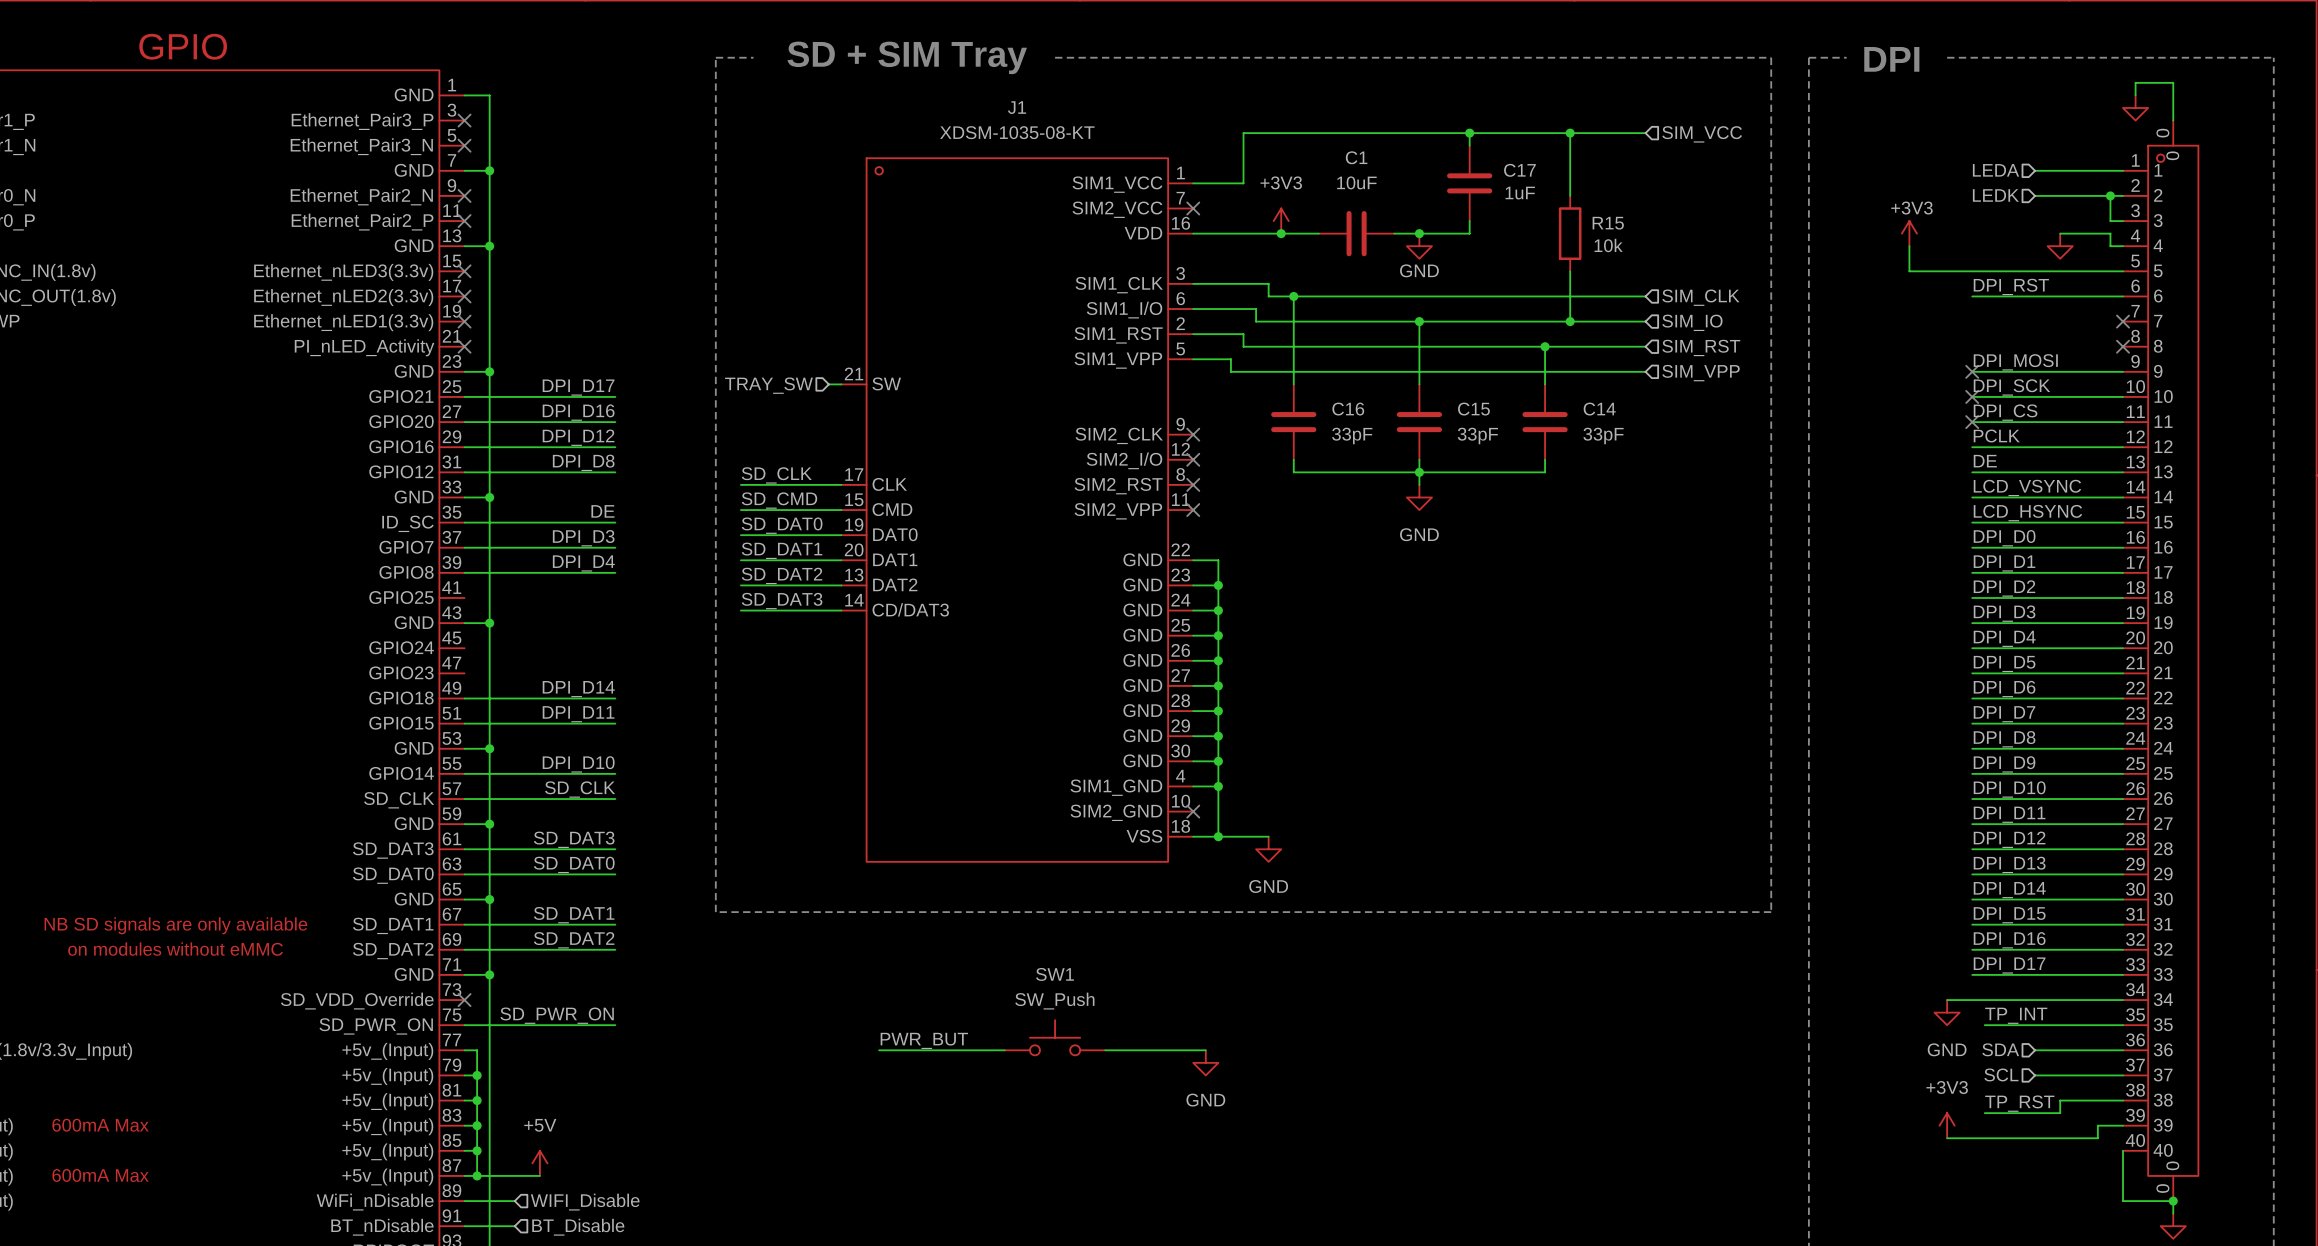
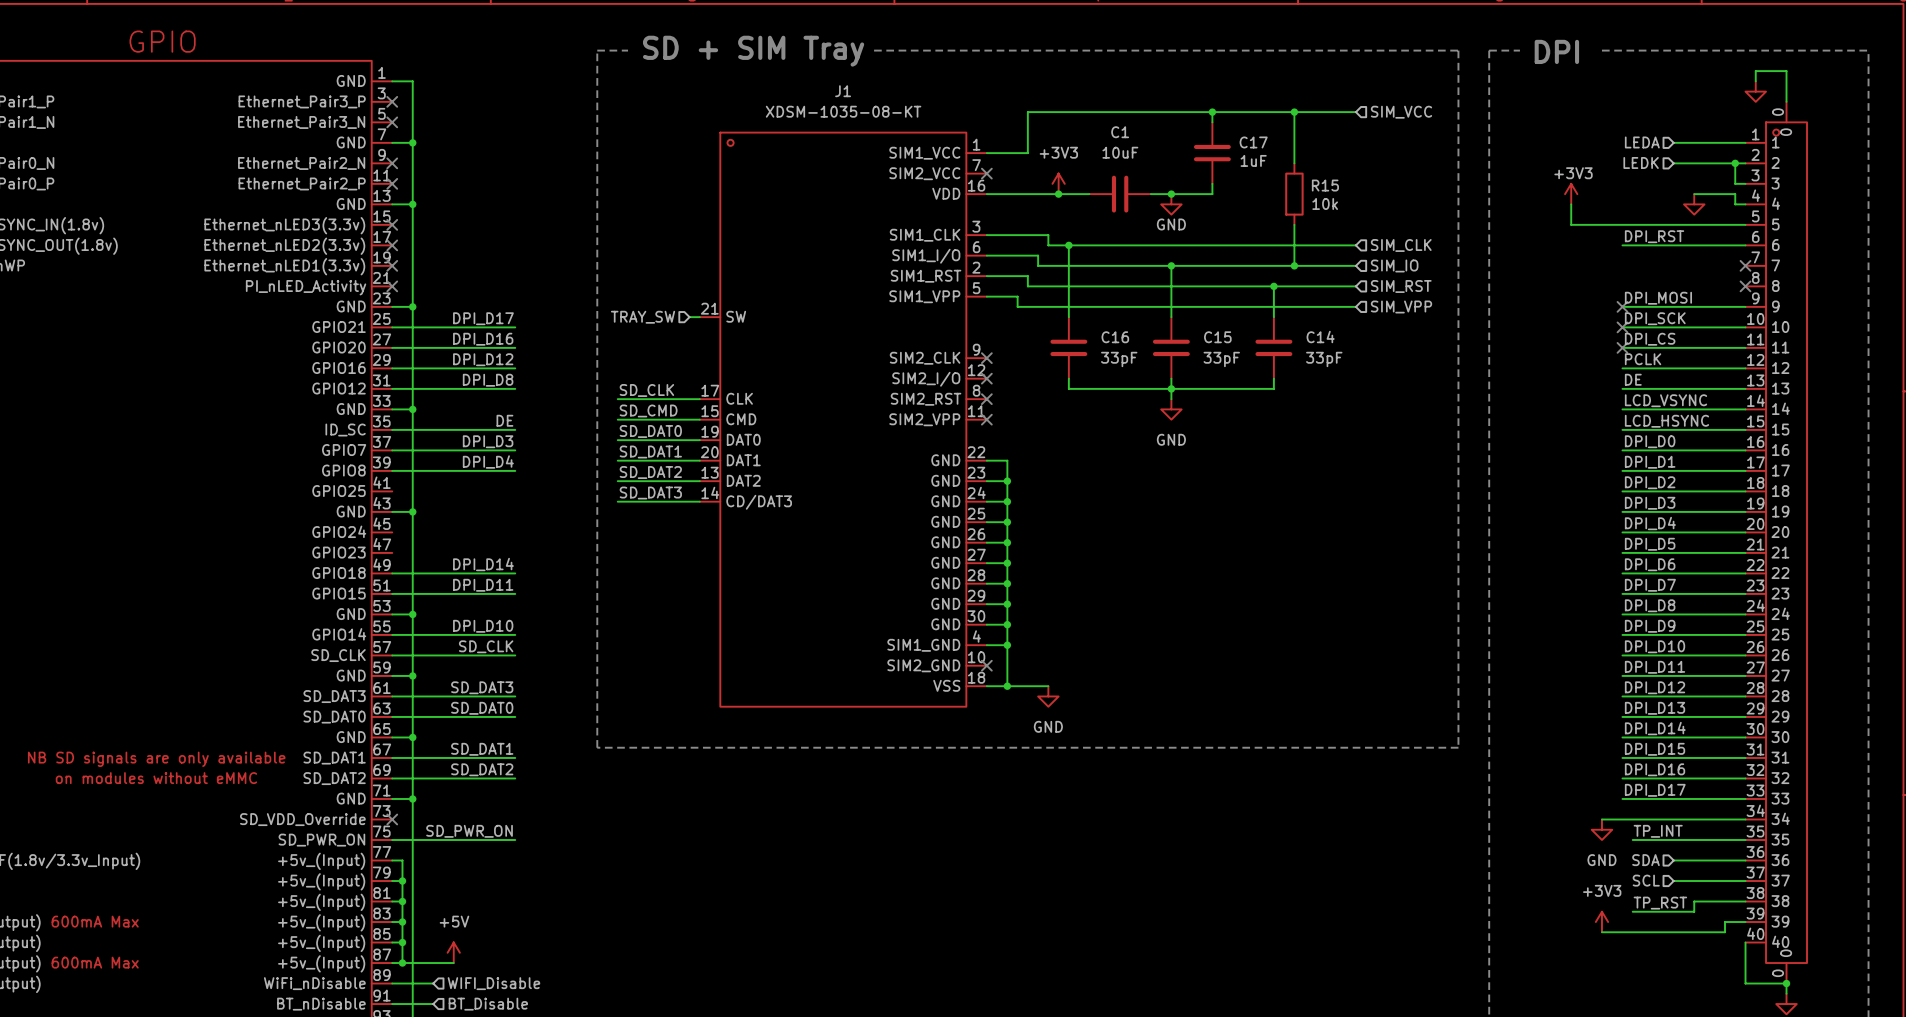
SW1: SW_Push (1055, 1037) -> none
label: PWR_BUT (924, 1040) -> none
wire: (879, 1050) (1004, 1050) -> none
wire: (1105, 1050) (1205, 1050) -> none
power symbol: GND (1205, 1062) -> none

